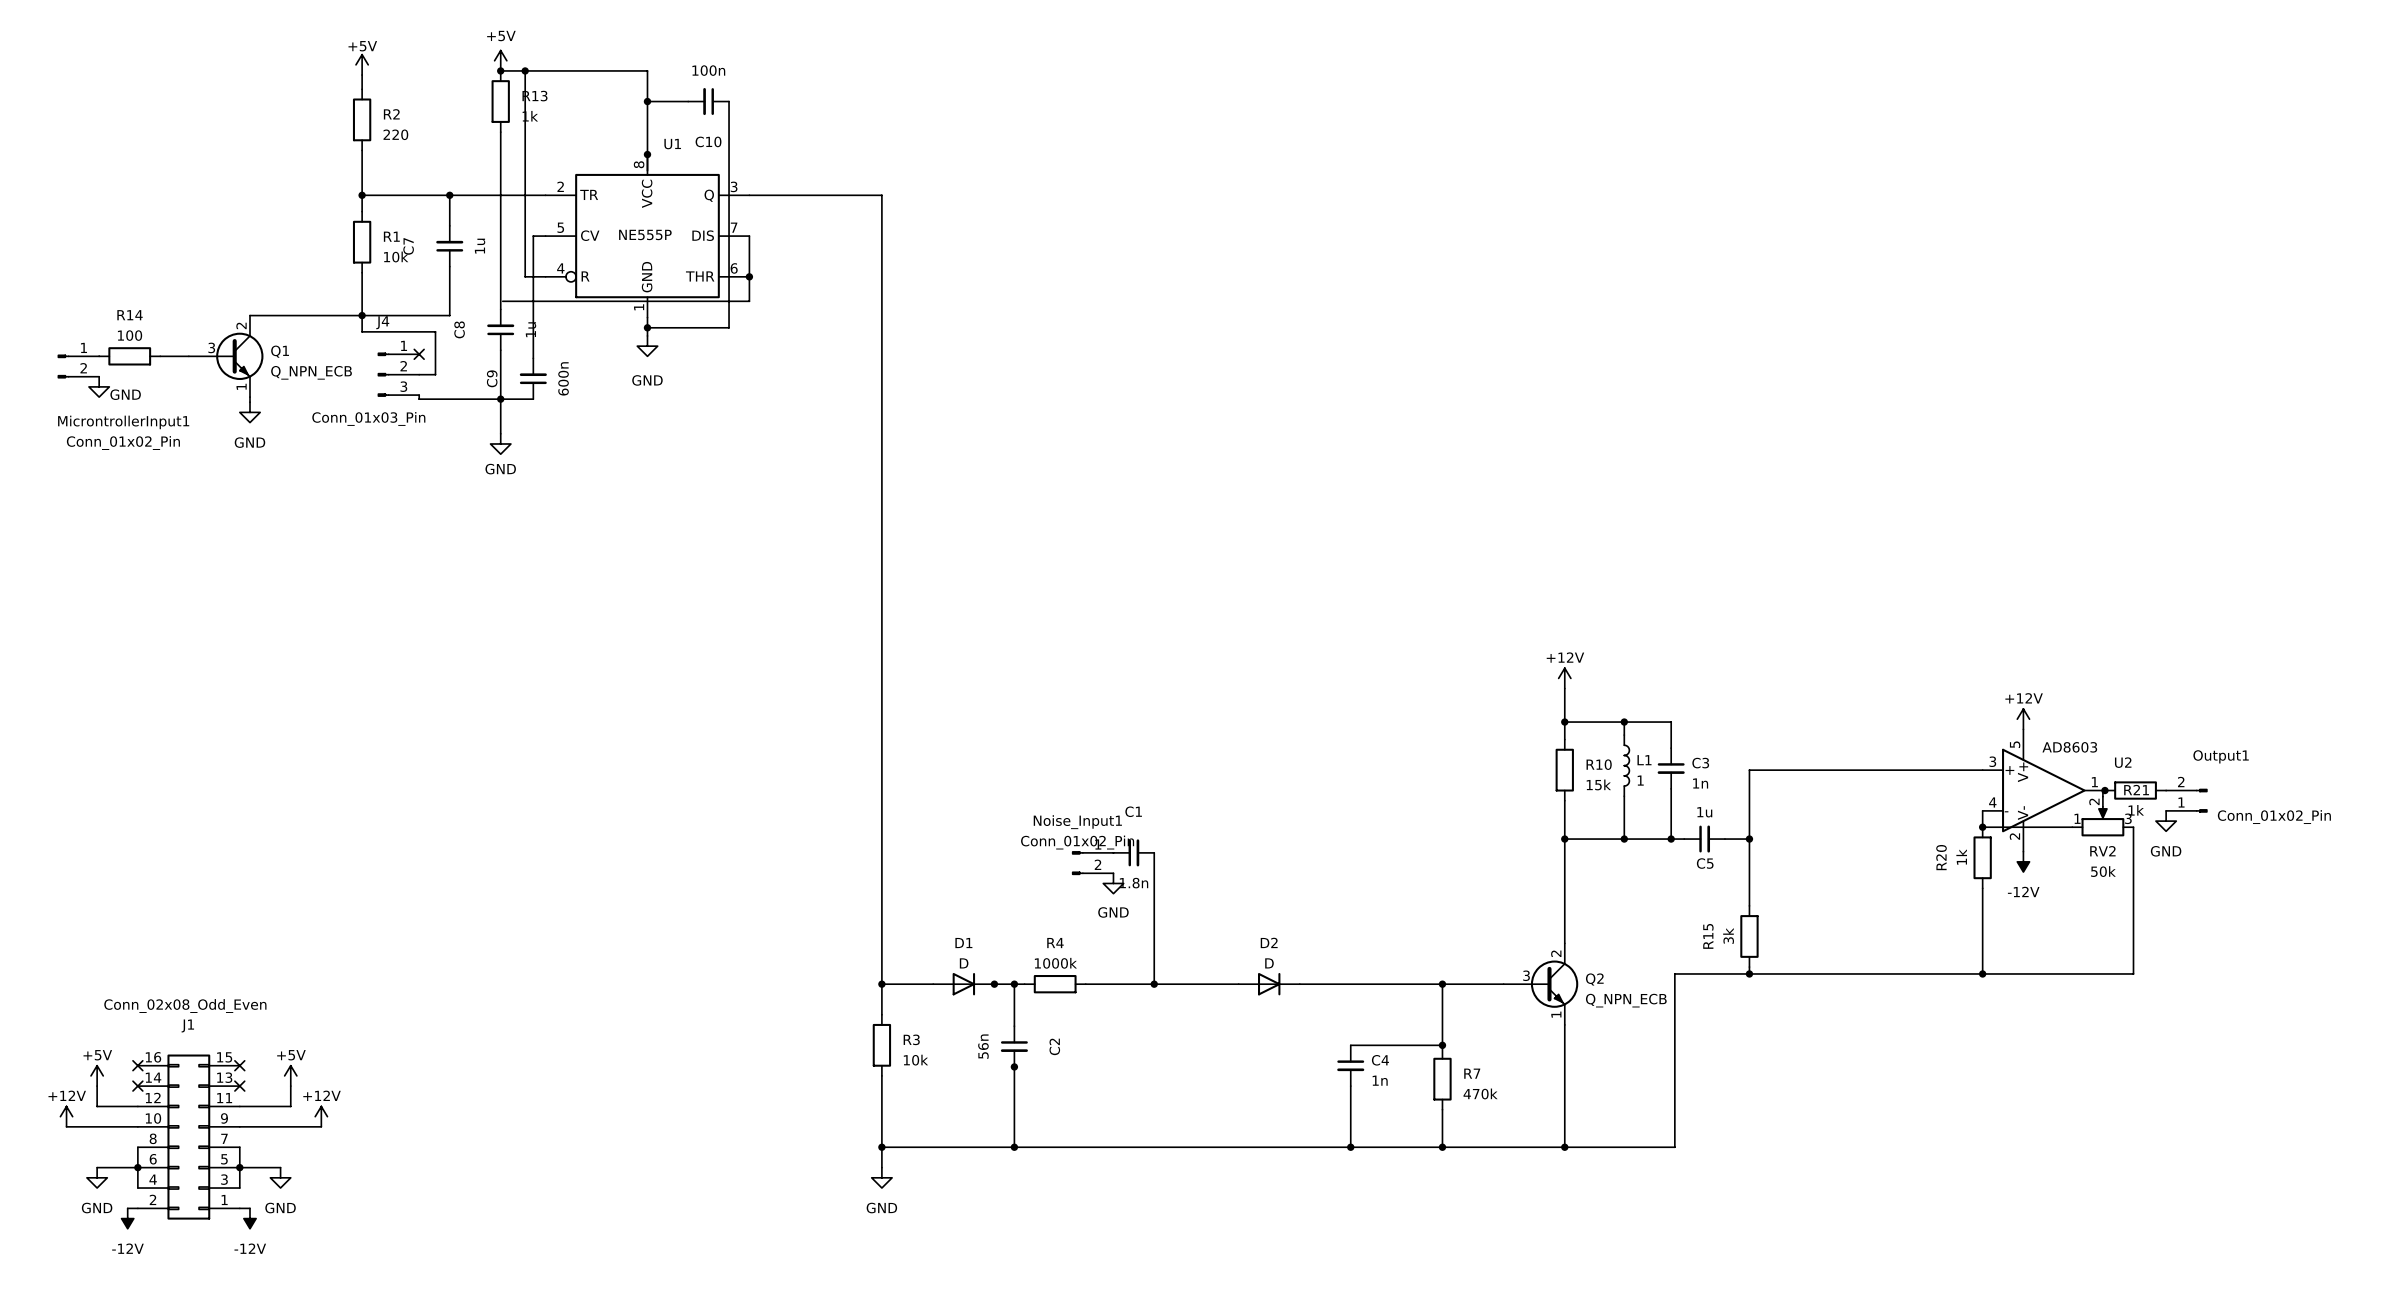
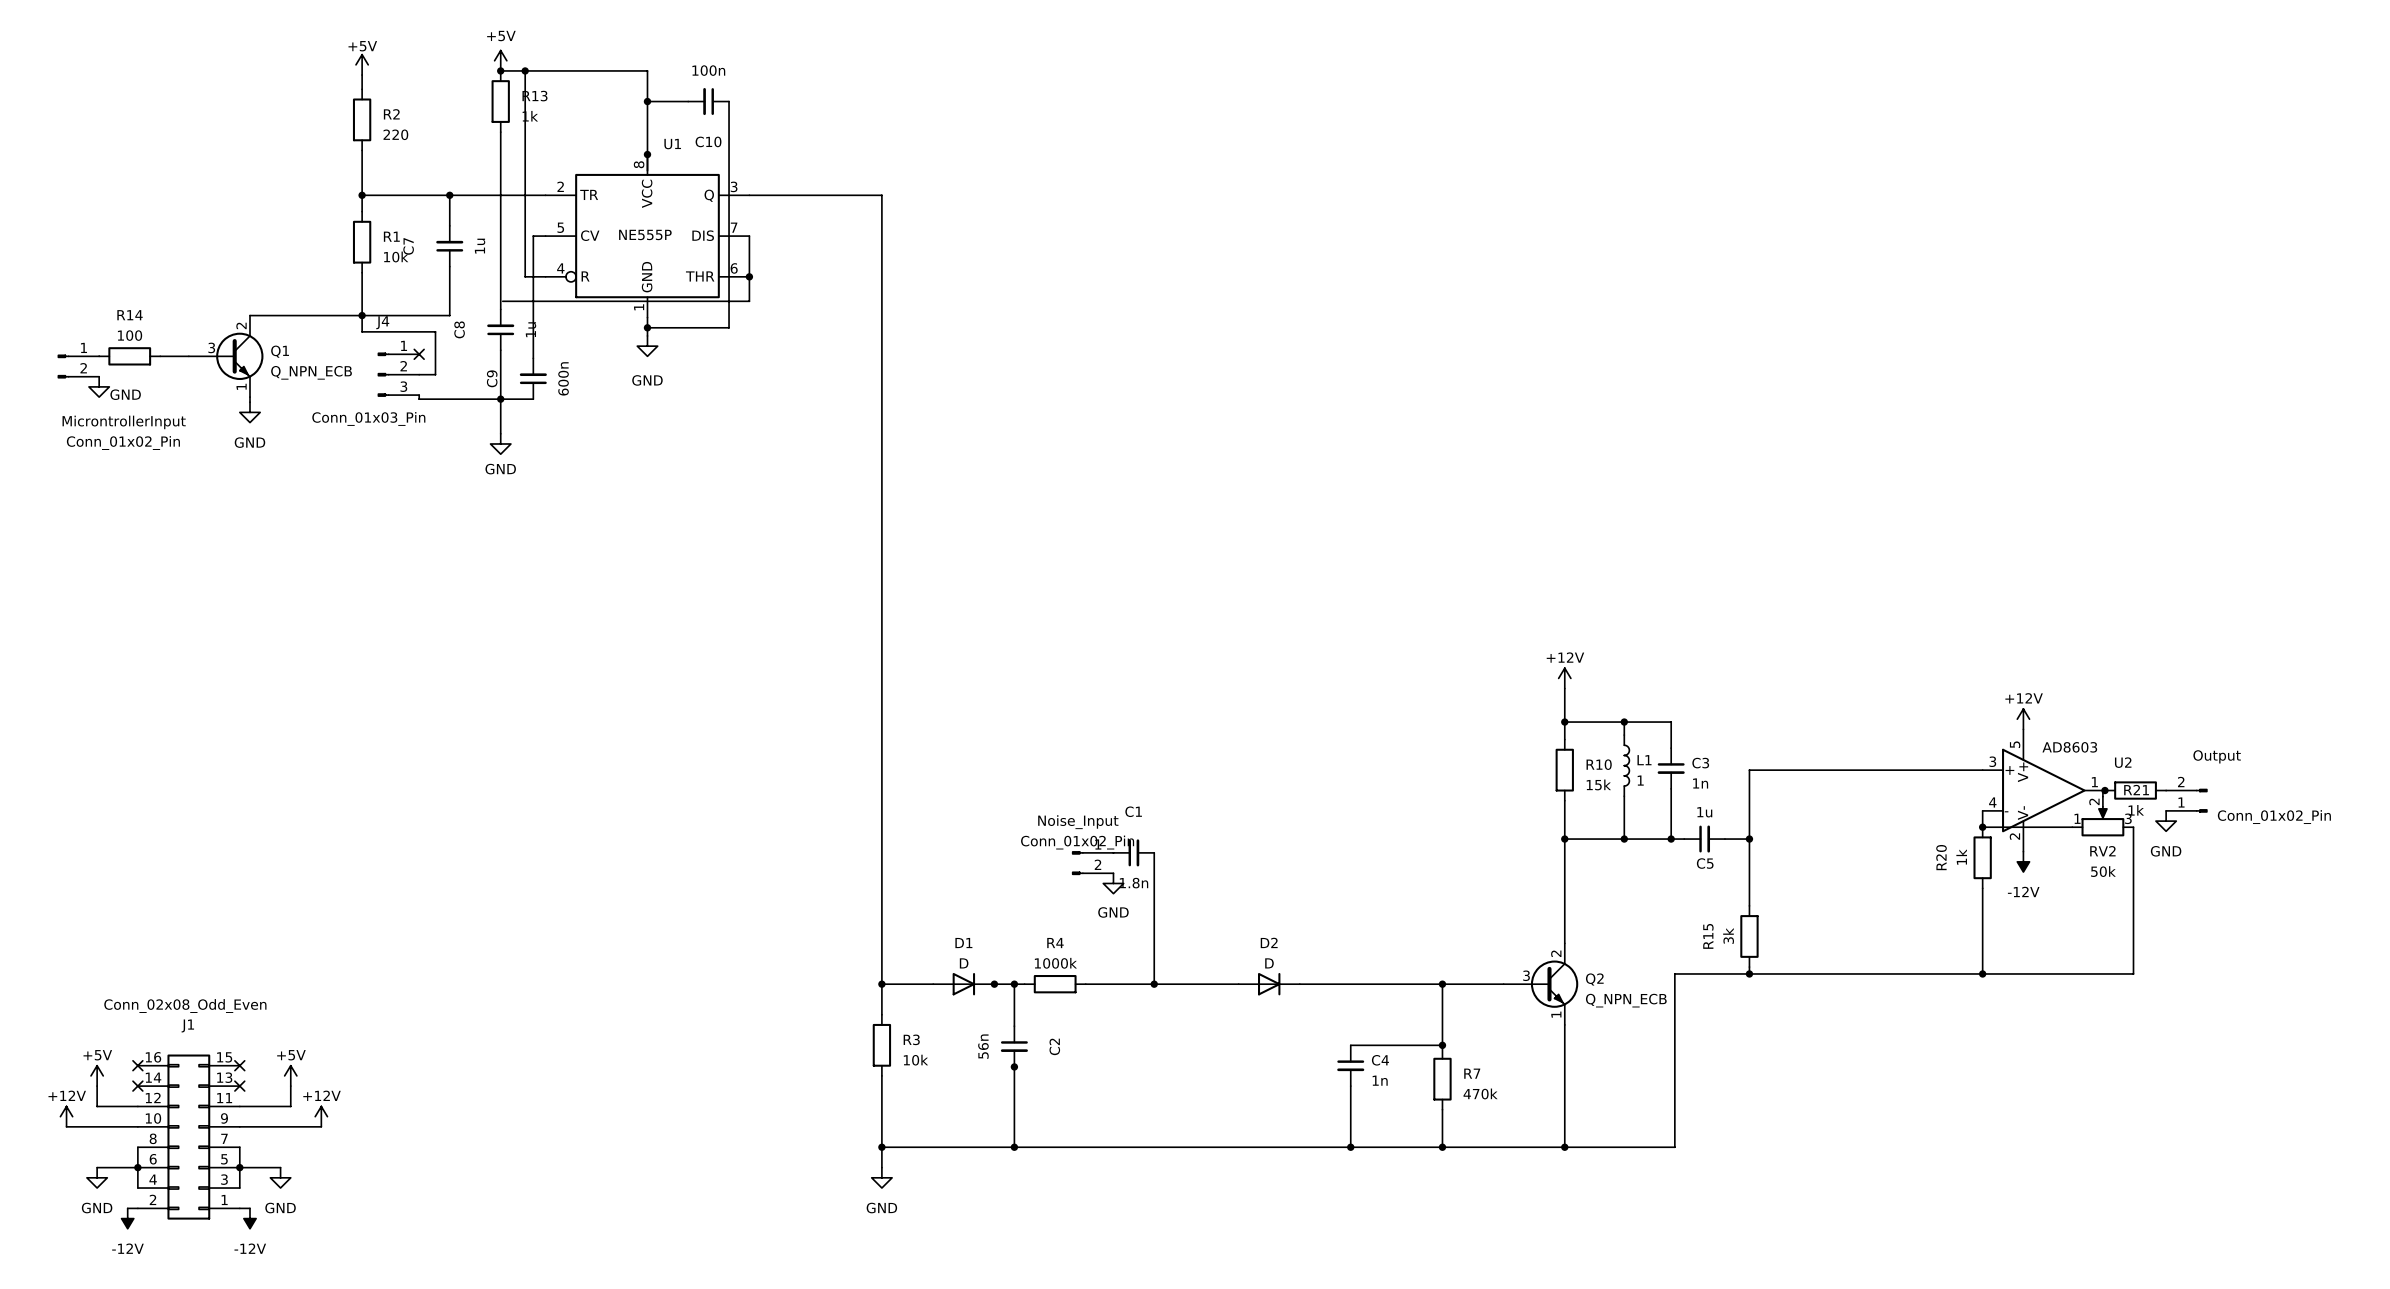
MicrontrollerInput1 name: MicrontrollerInput1 (123, 422) -> MicrontrollerInput (124, 422)
Output1 name: Output1 (2221, 756) -> Output (2217, 756)
Noise_Input1 name: Noise_Input1 (1077, 822) -> Noise_Input (1078, 822)

